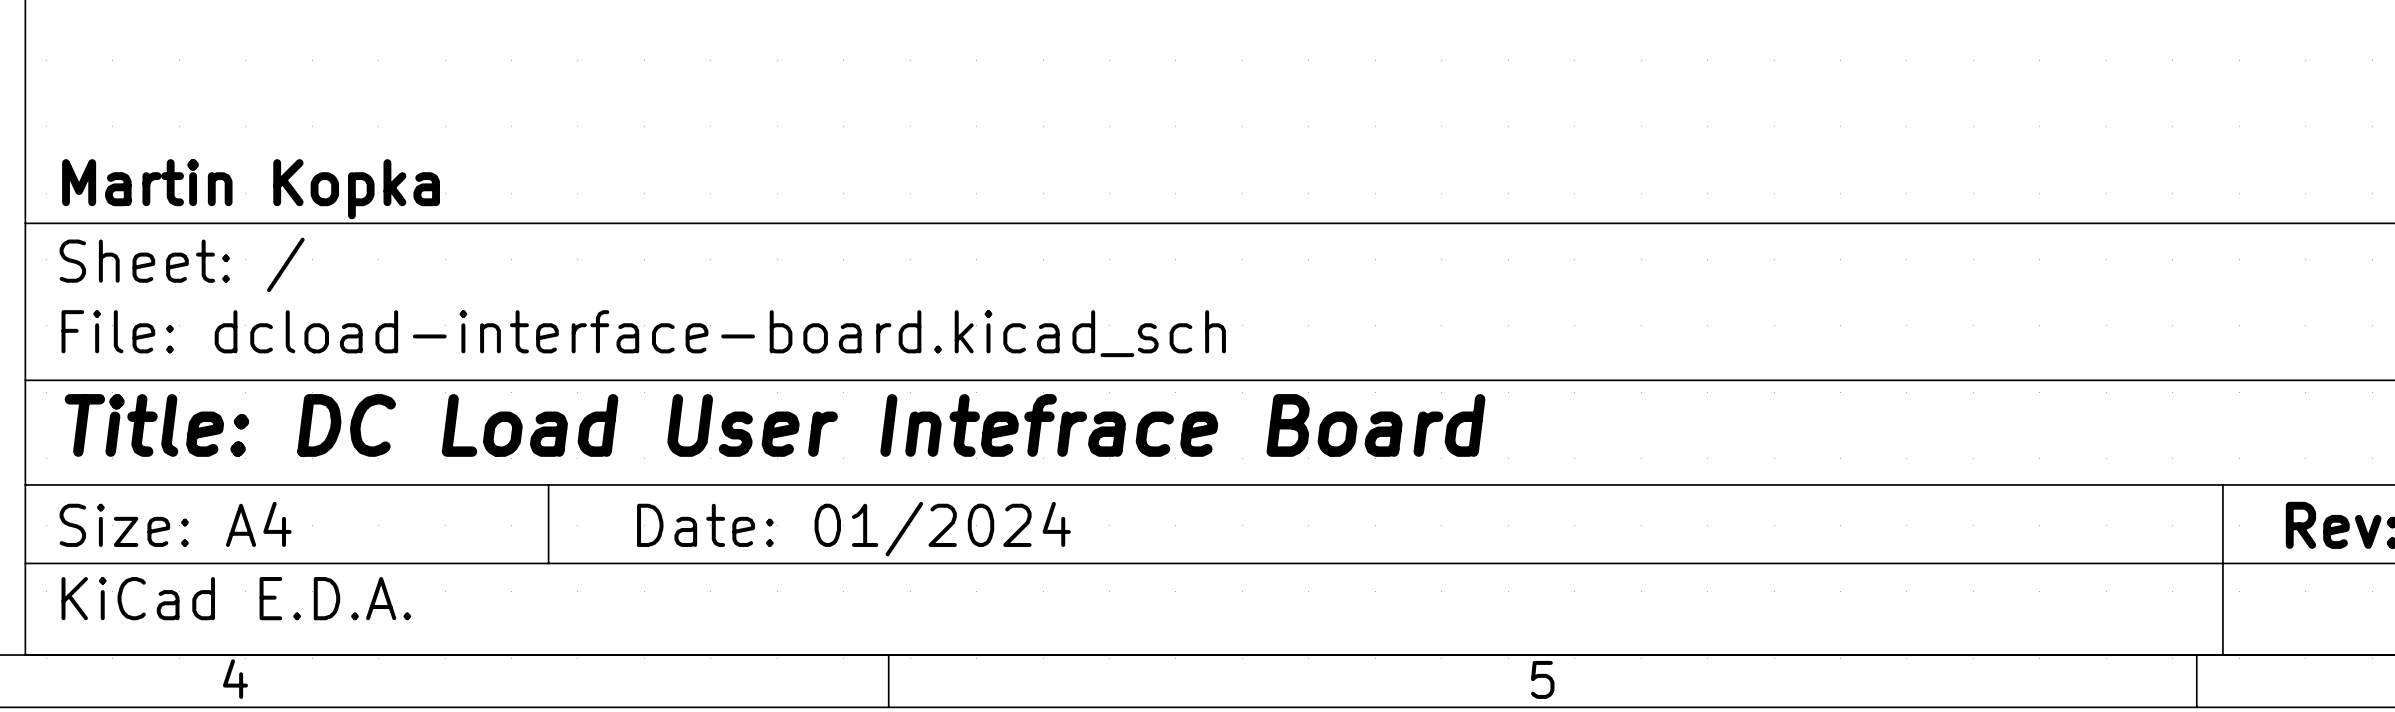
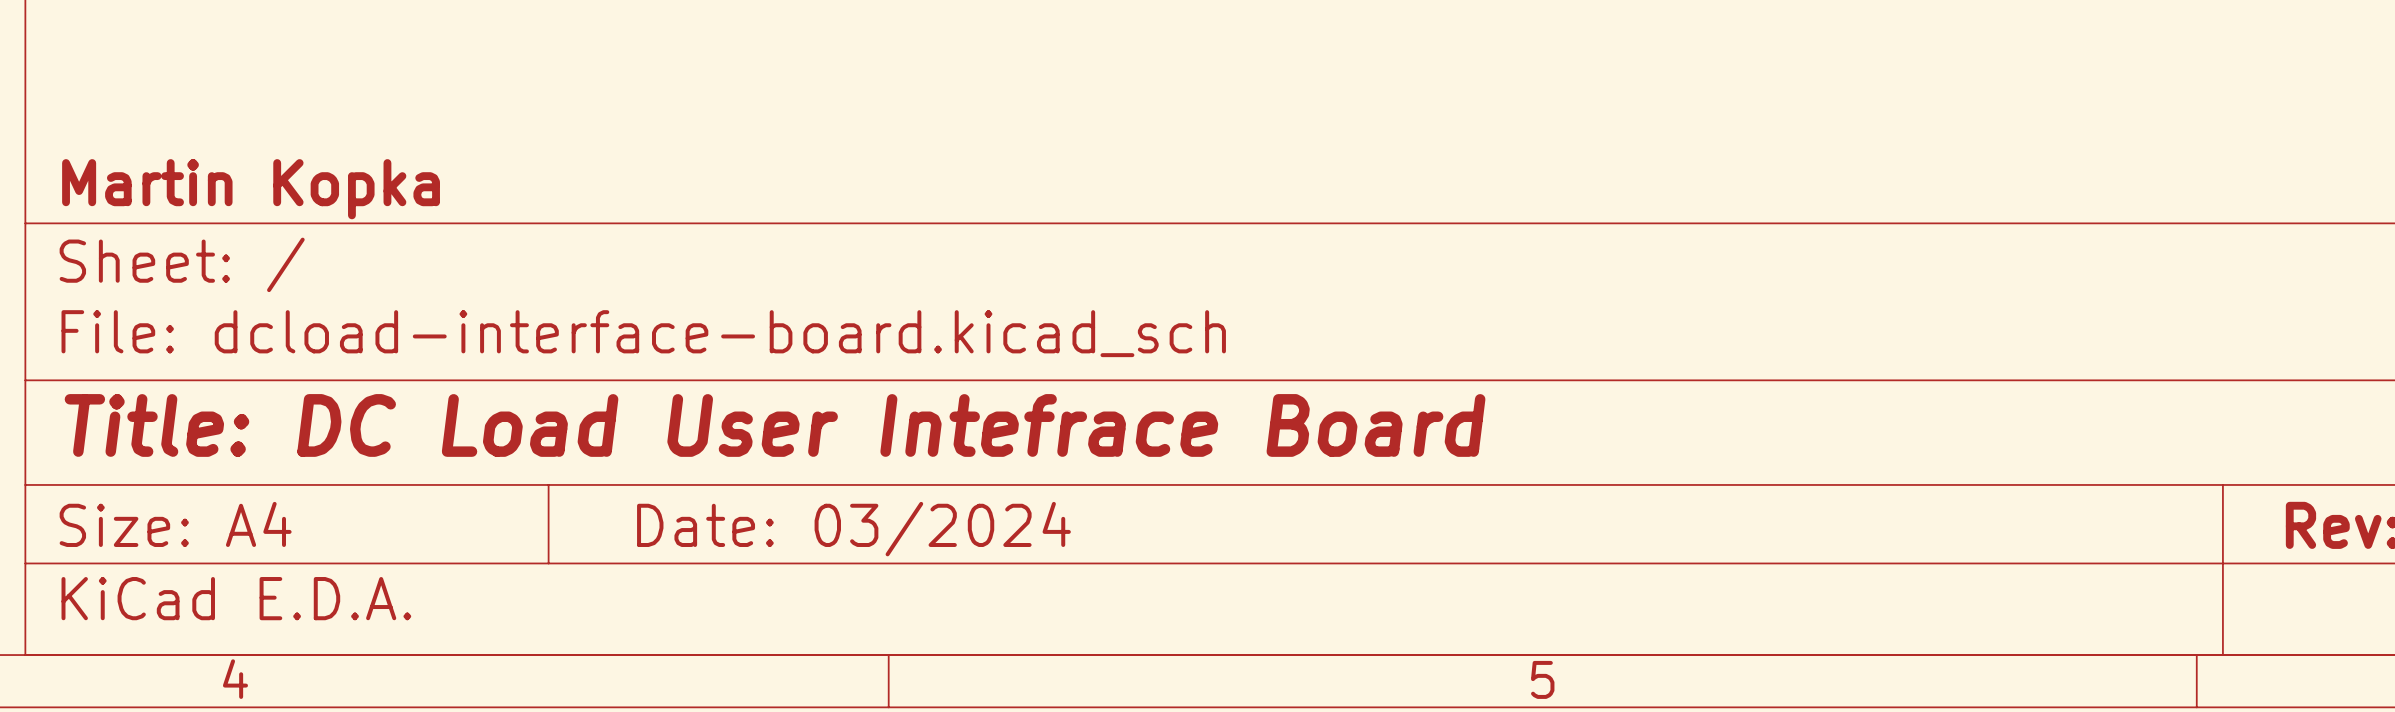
title block: Date: 01/2024 (853, 529) -> Date: 03/2024 (853, 529)

